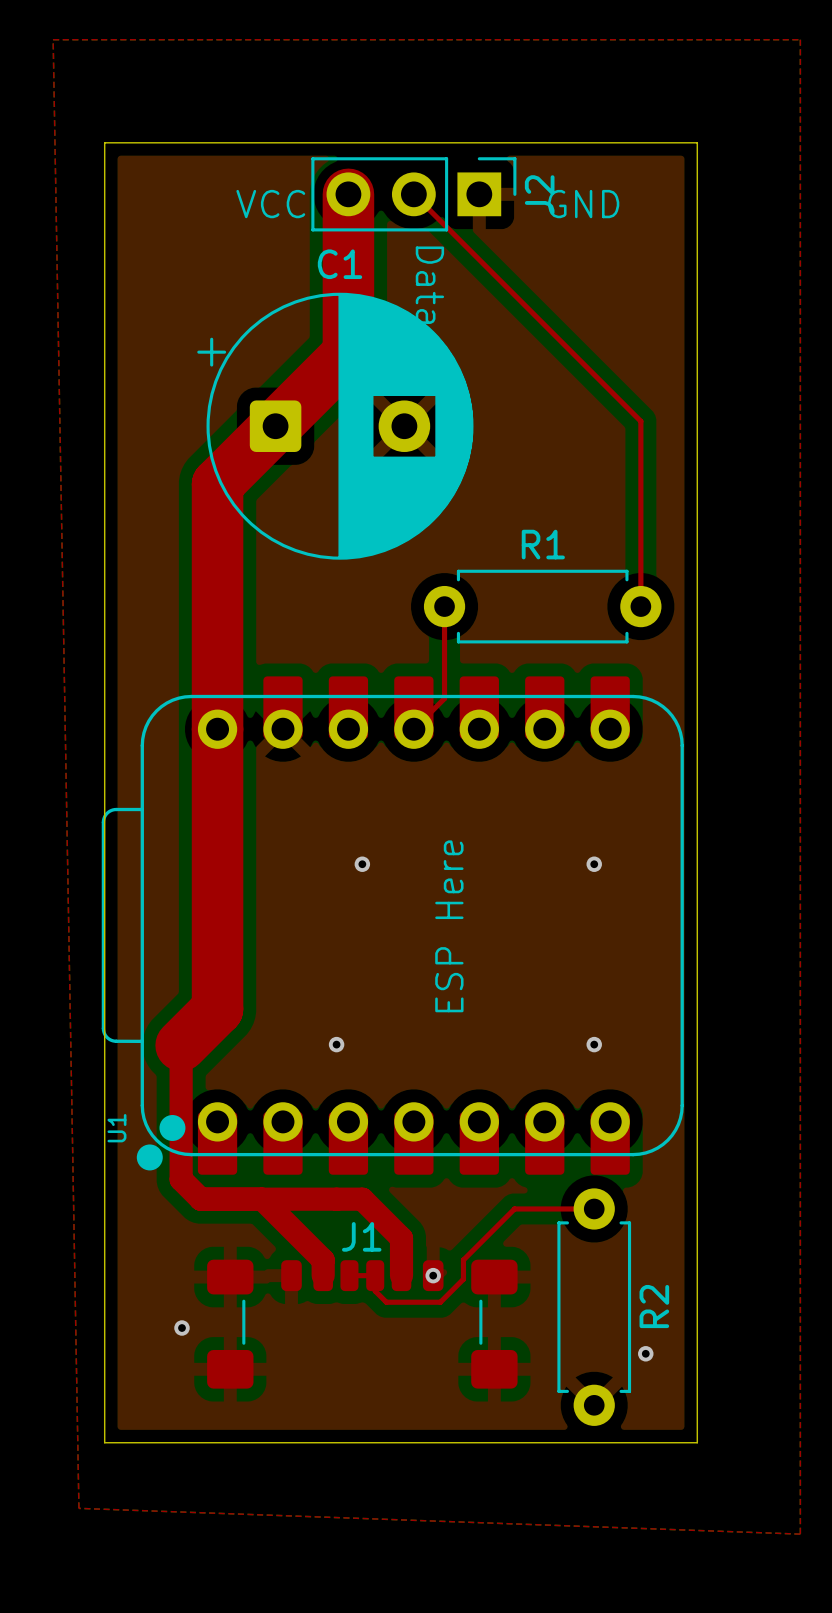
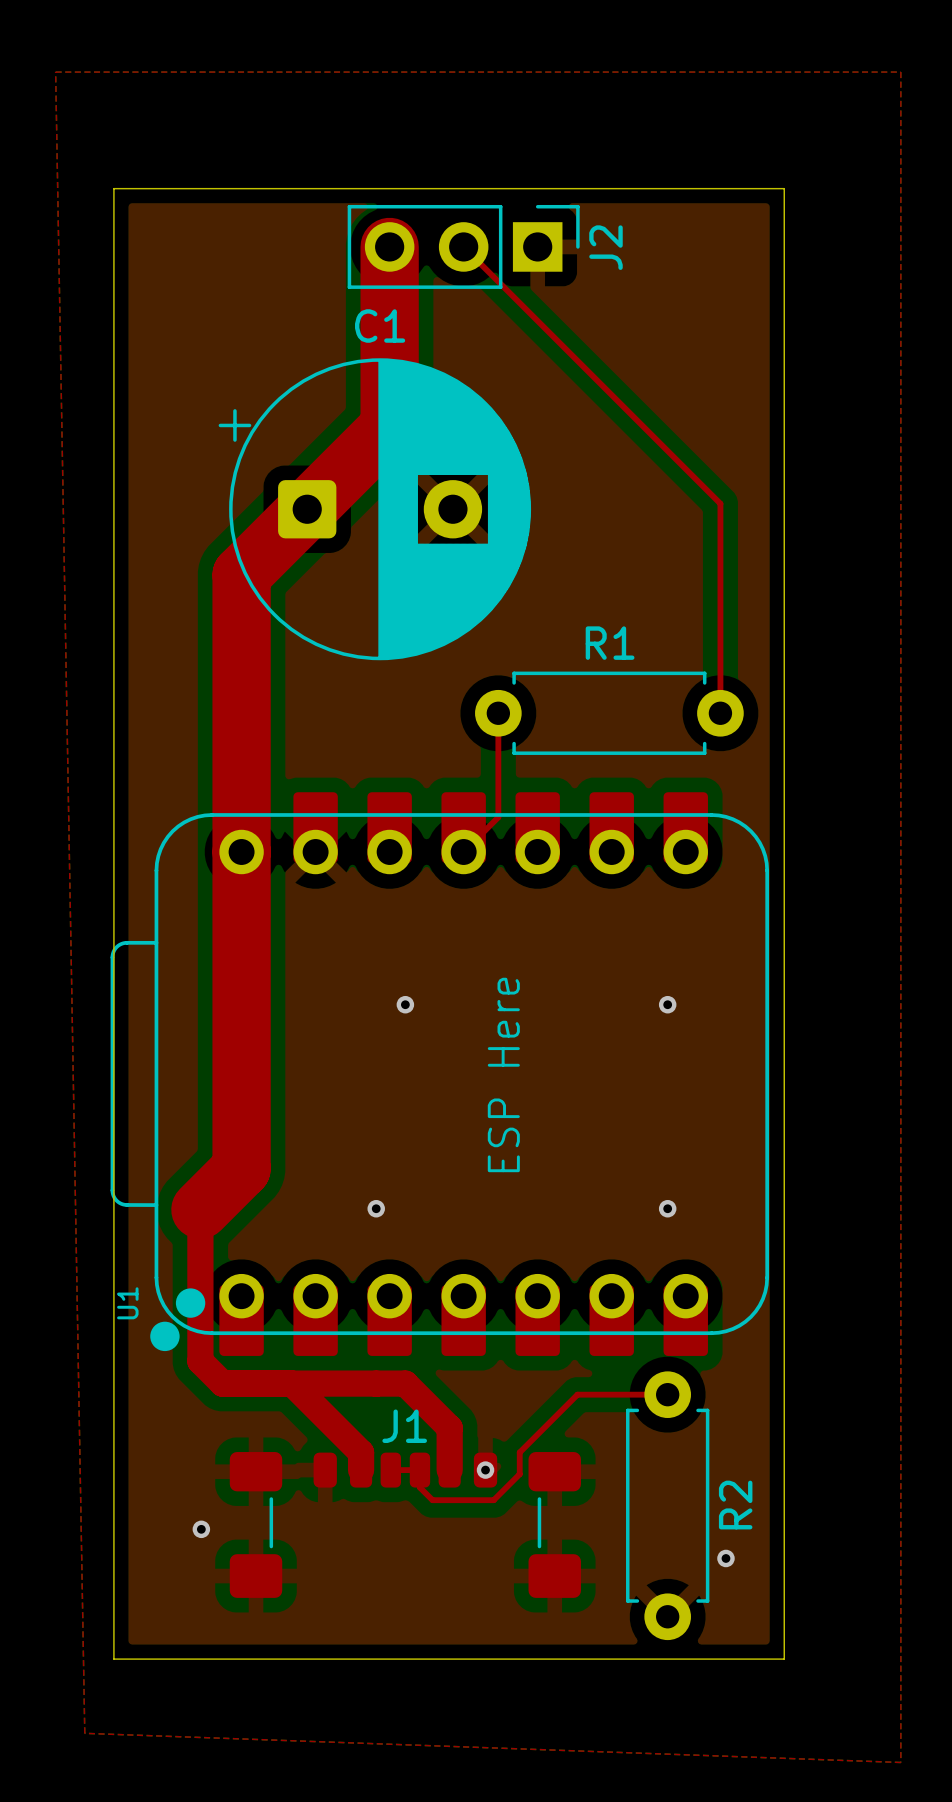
text: VCC (270, 204) -> none
text: GND (583, 204) -> none
text: Data (429, 285) -> none

